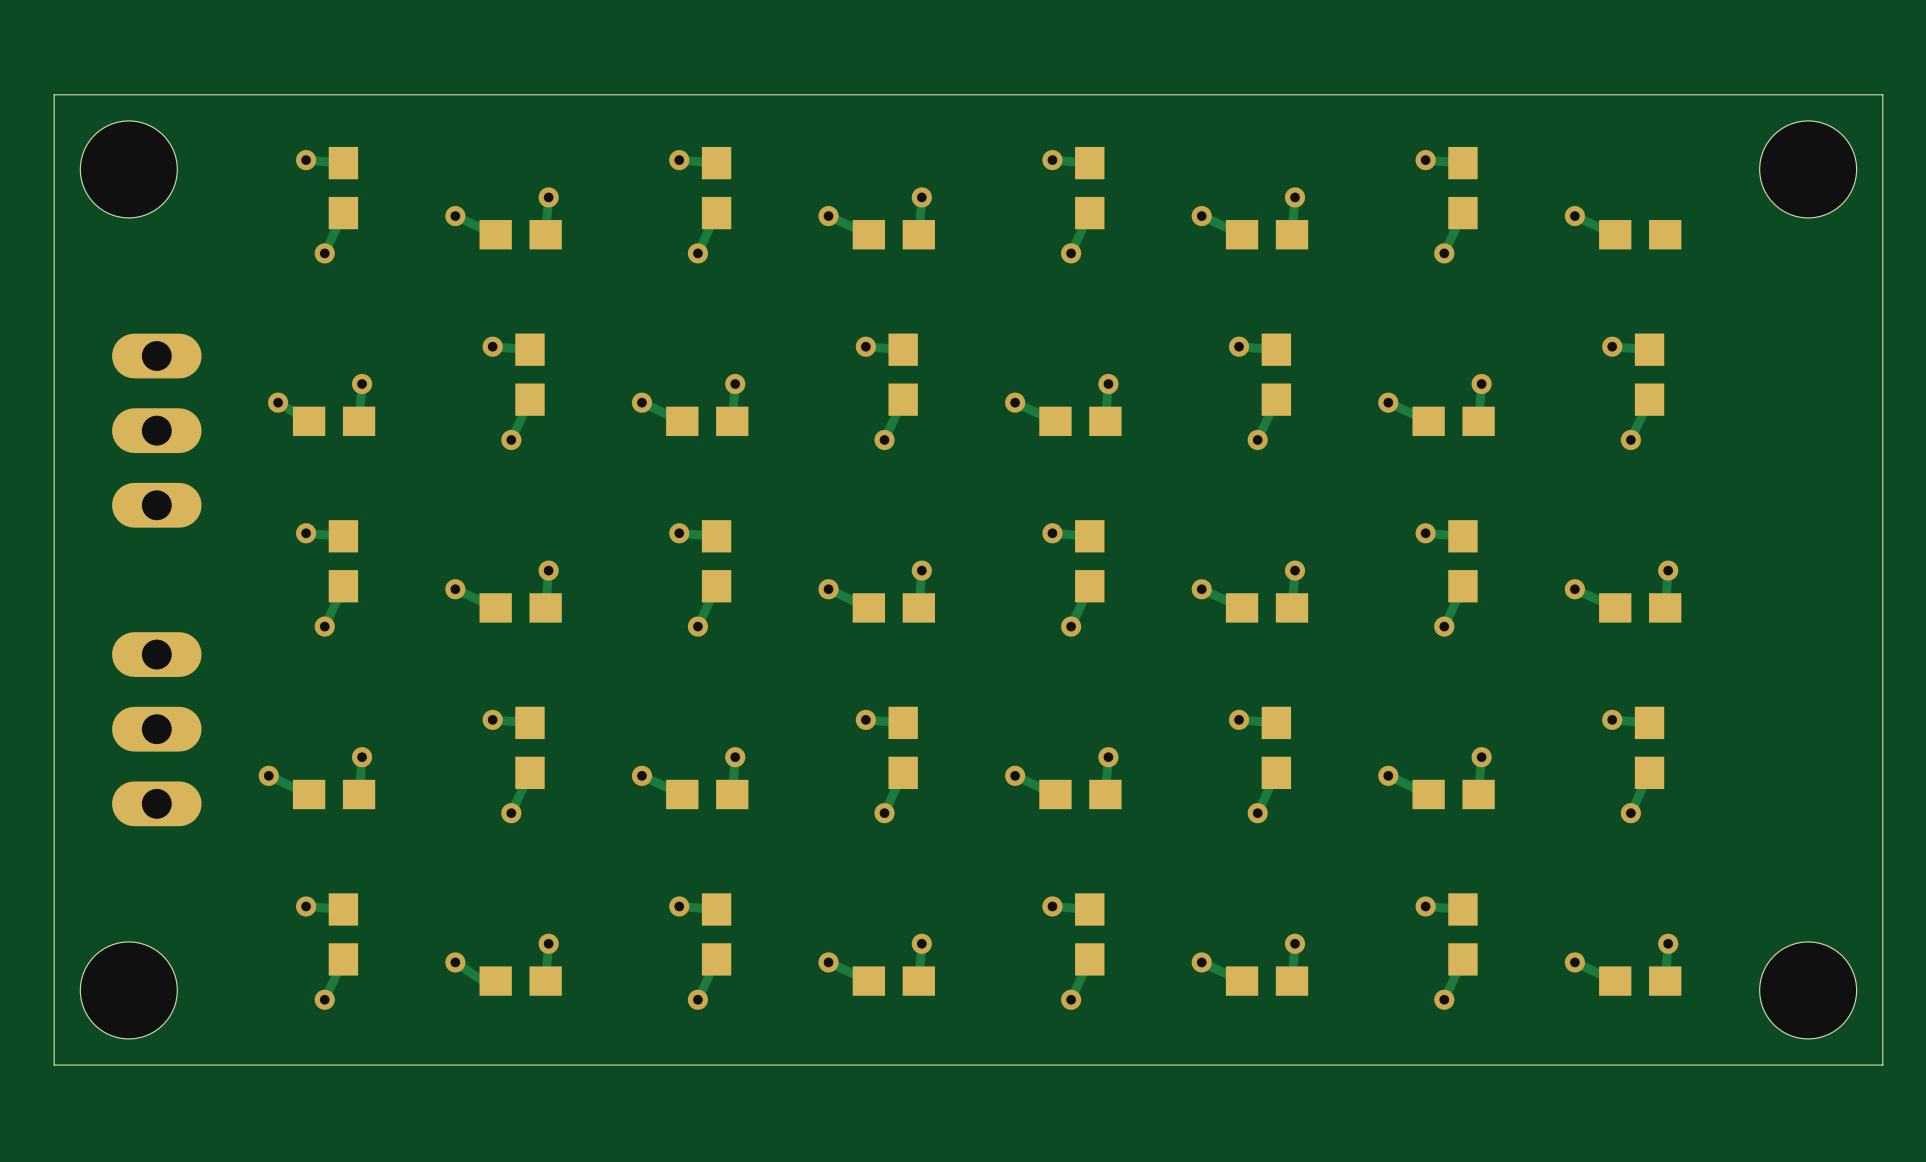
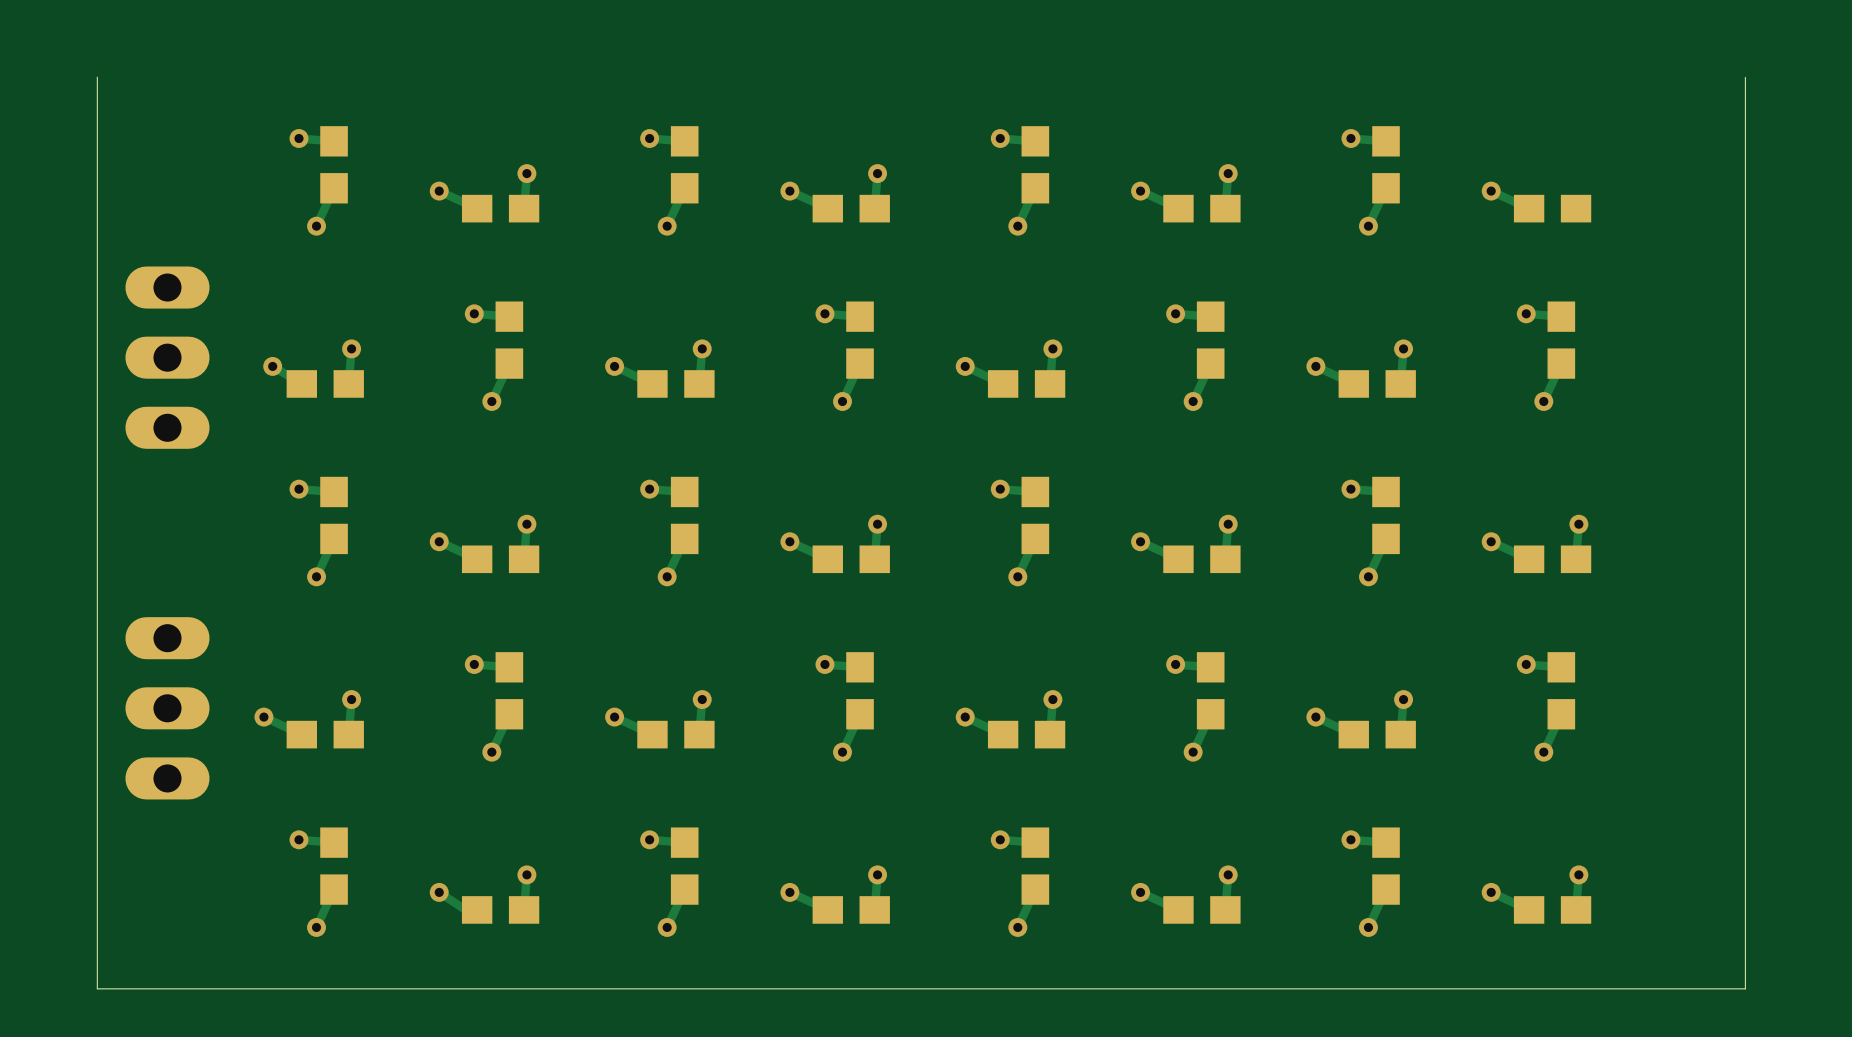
board edge: (1882, 94) (54, 94) (54, 1065) (91, 1065) -> (97, 77) (97, 988)
board edge: (1882, 95) (1882, 1065) (1845, 1065) -> (1745, 77) (1745, 988)
part: (128, 169) -> none
part: (1808, 169) -> none
part position: (156, 430) -> (167, 357)
part position: (156, 729) -> (167, 708)
part: (128, 990) -> none
part: (1808, 990) -> none

